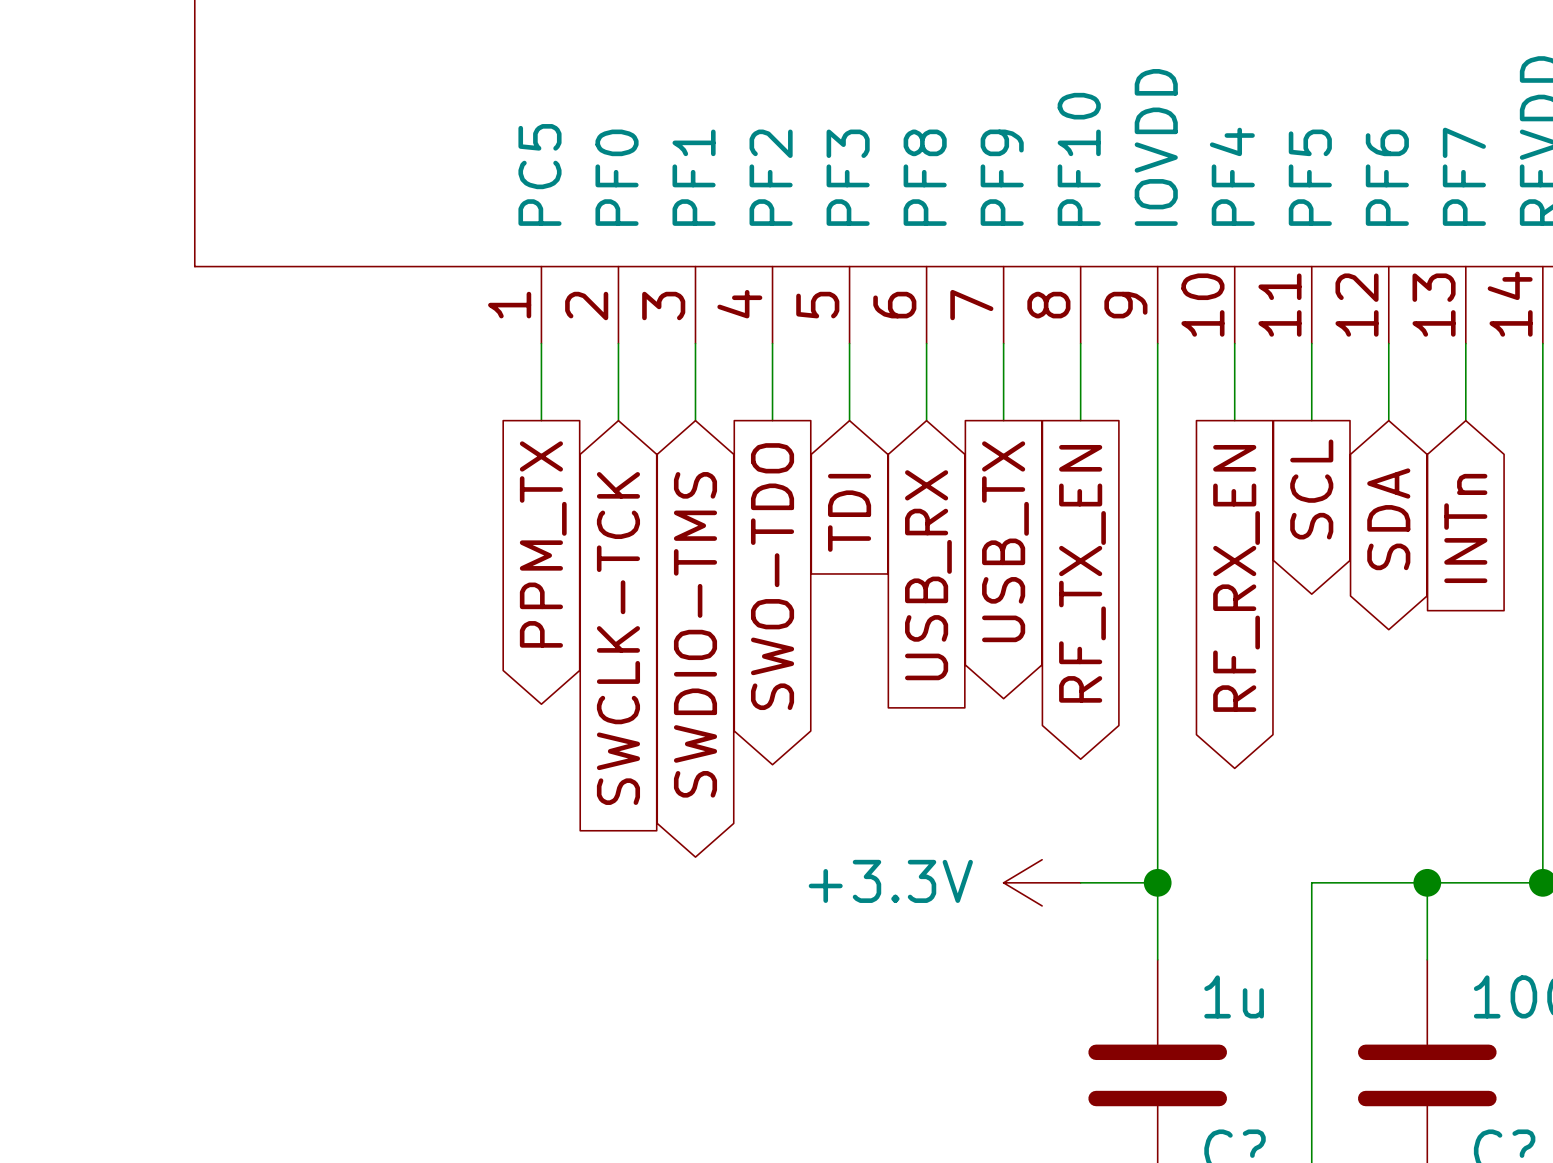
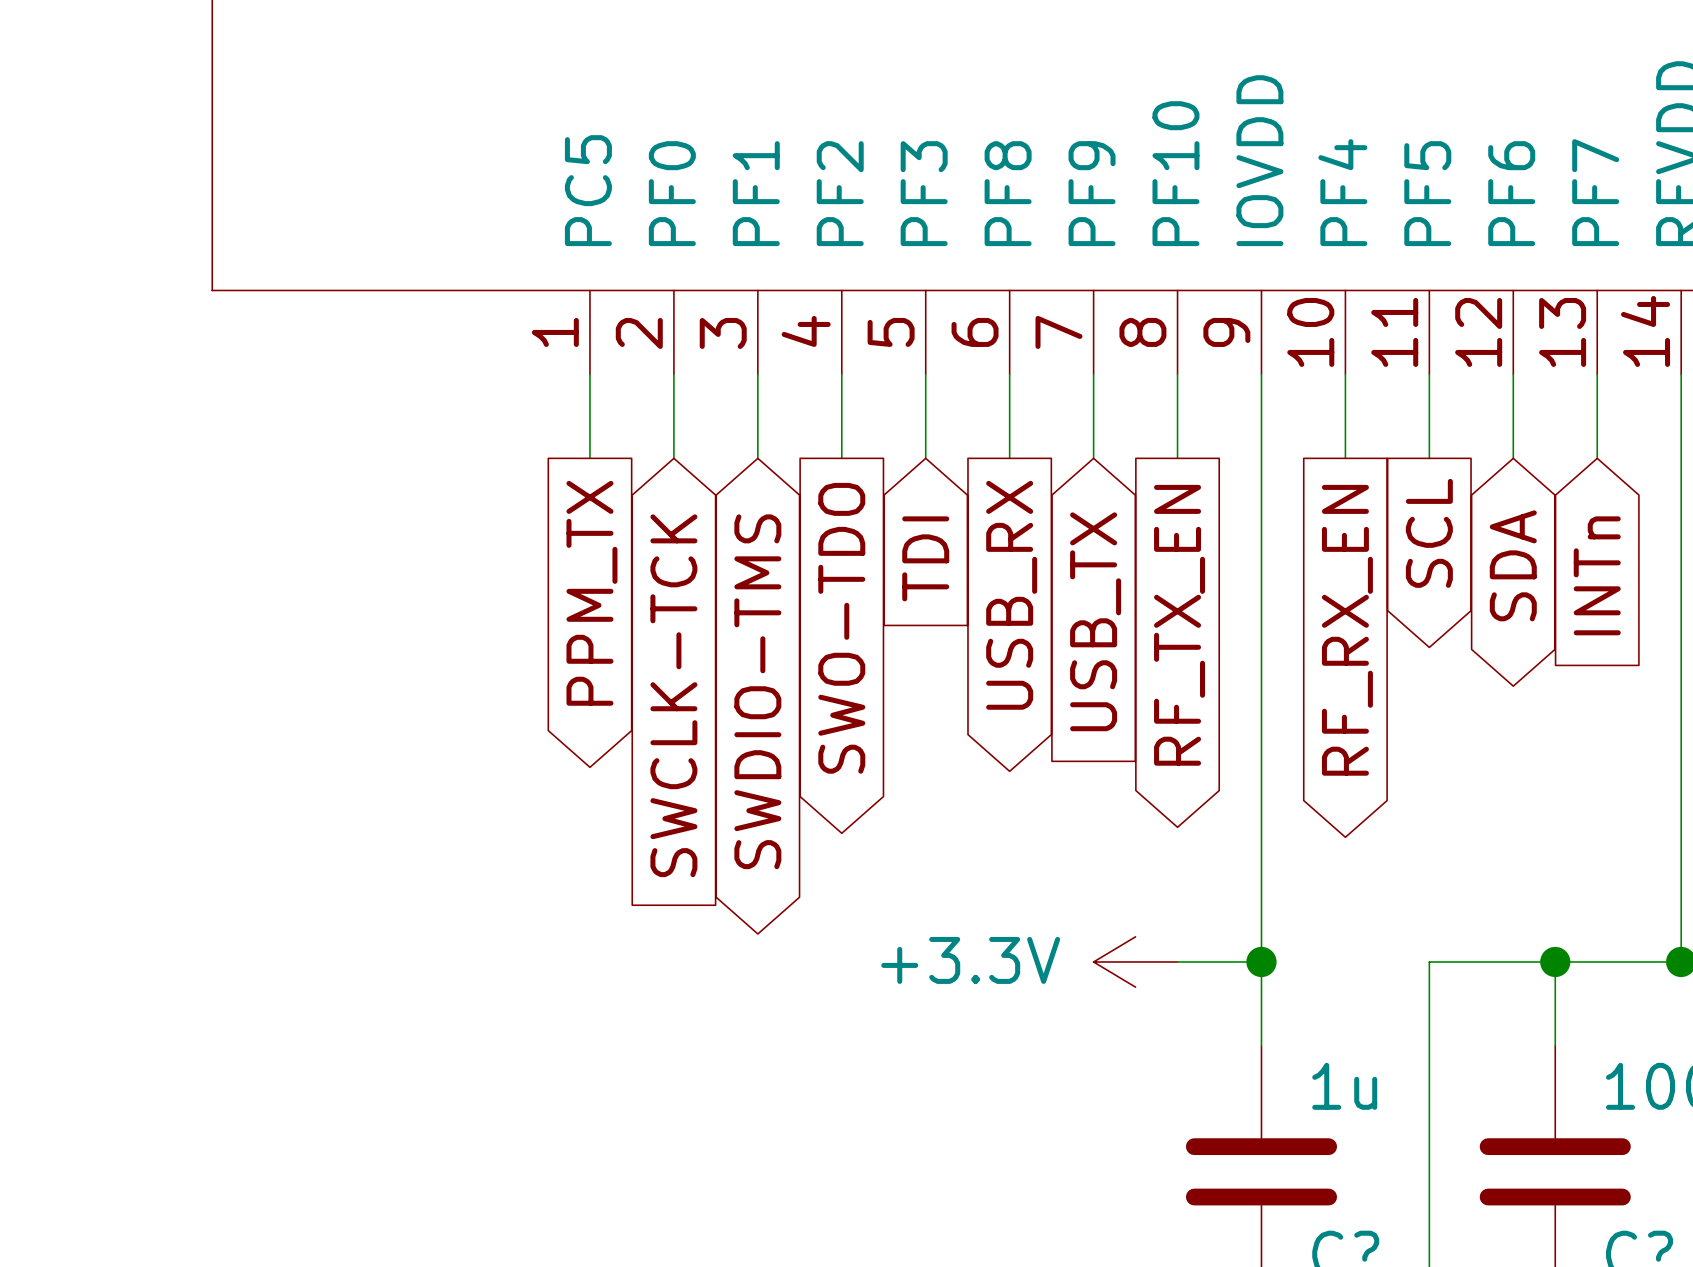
global label shape: output (1005, 541) -> input (1095, 621)
global label shape: input (928, 575) -> output (1011, 595)

